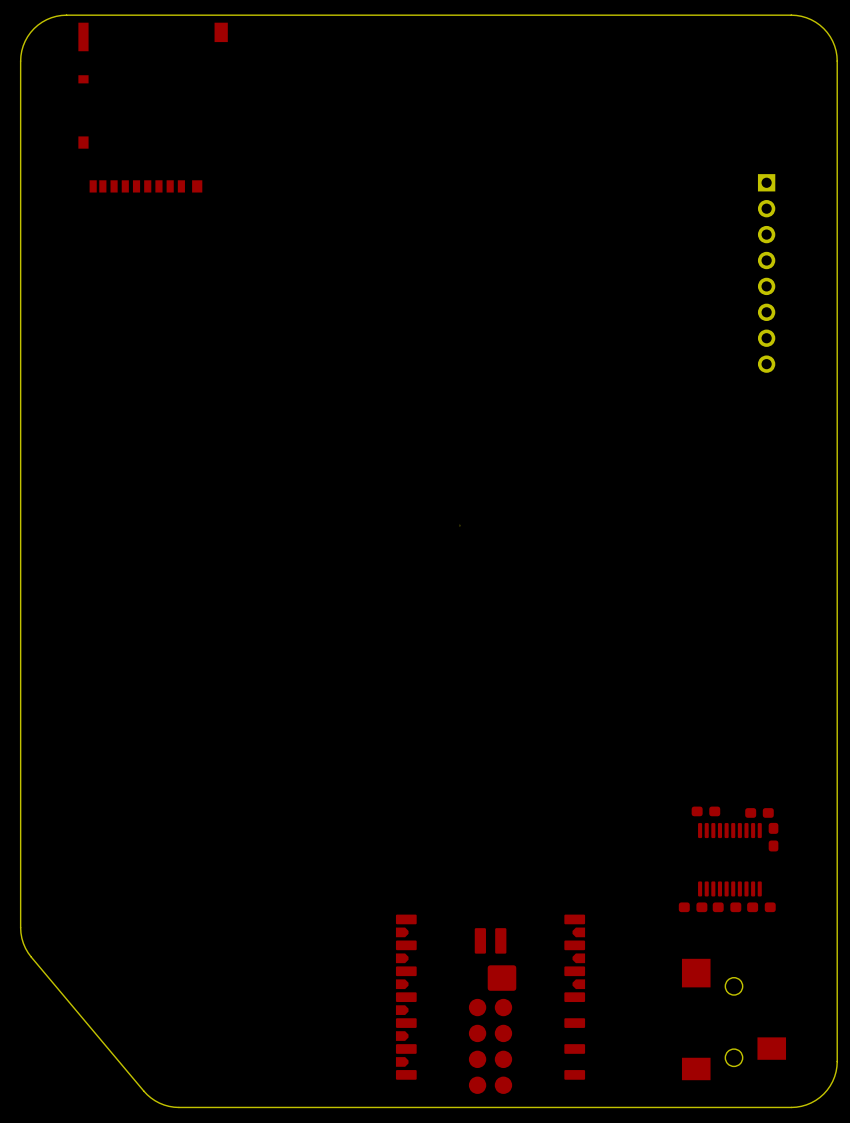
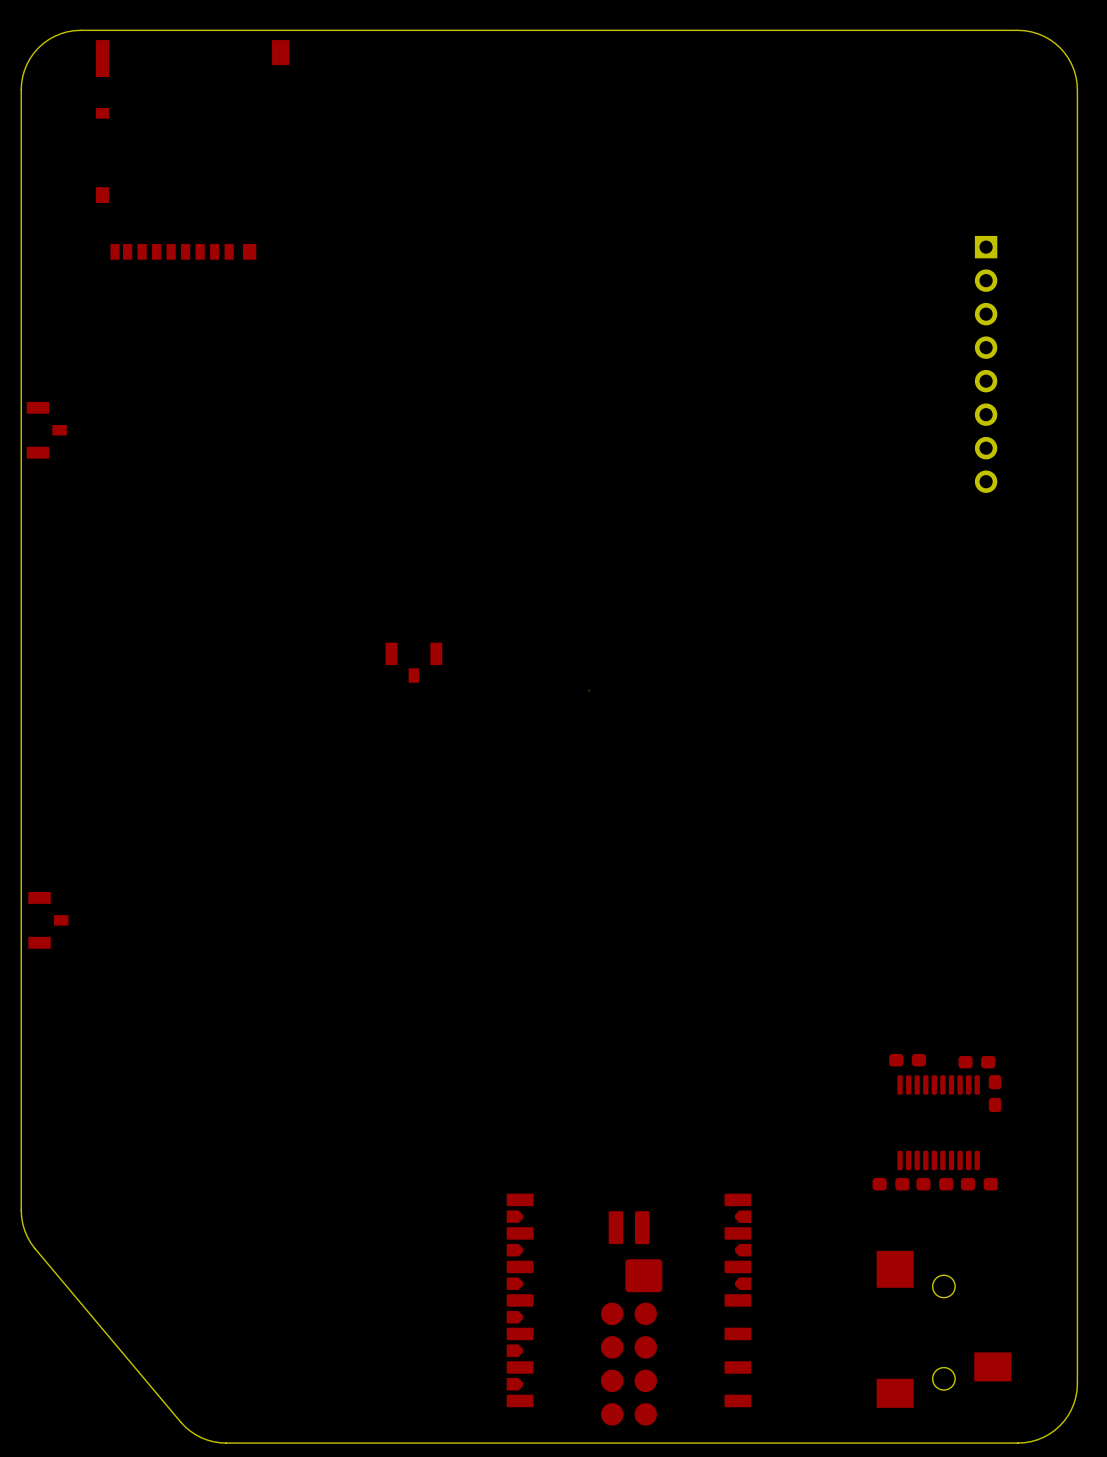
part: none -> (46, 430)
part: none -> (413, 662)
part: none -> (48, 920)

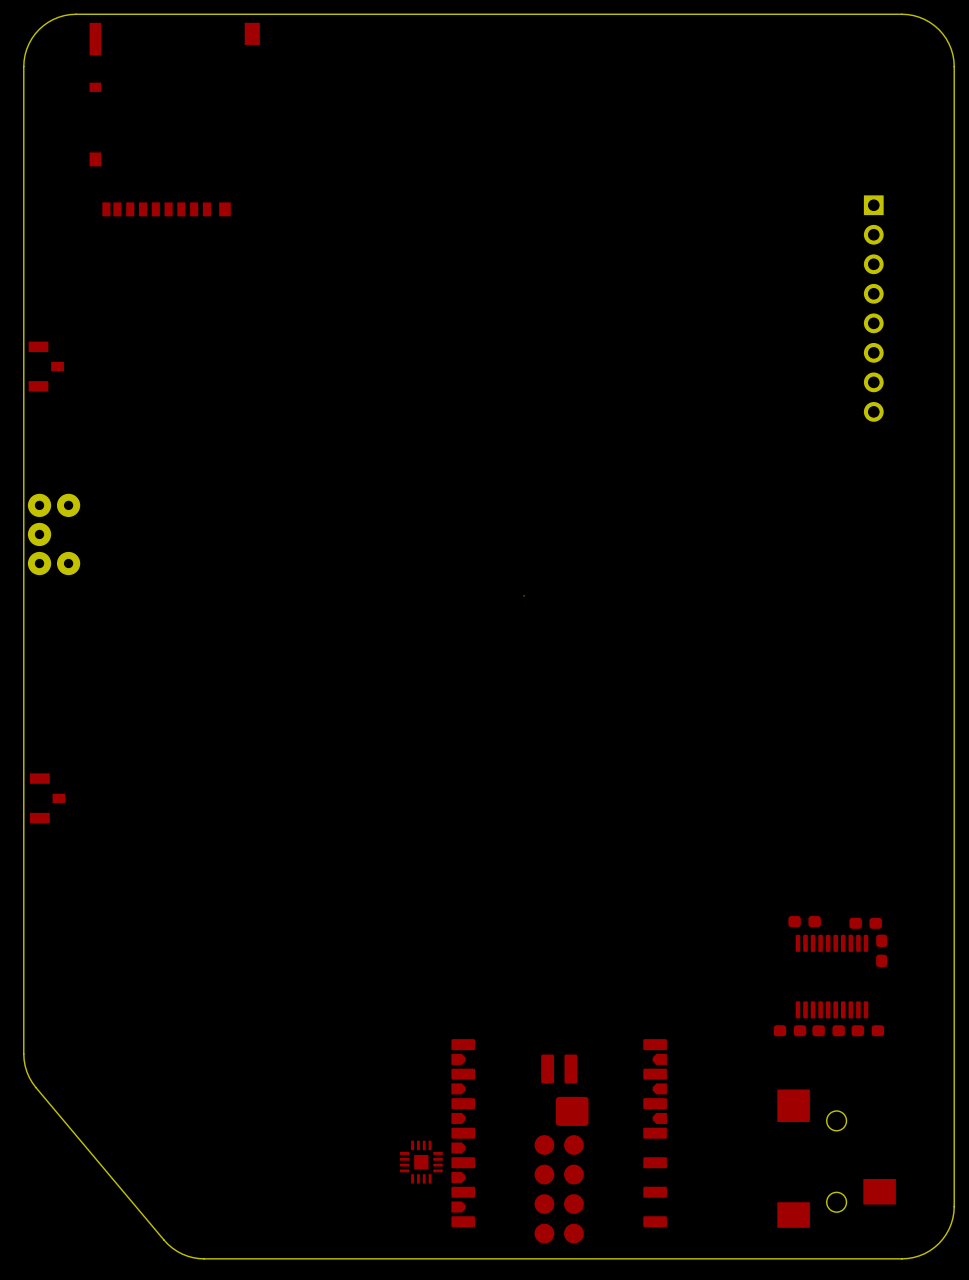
part: none -> (54, 534)
part: (413, 662) -> none
part: none -> (421, 1162)

